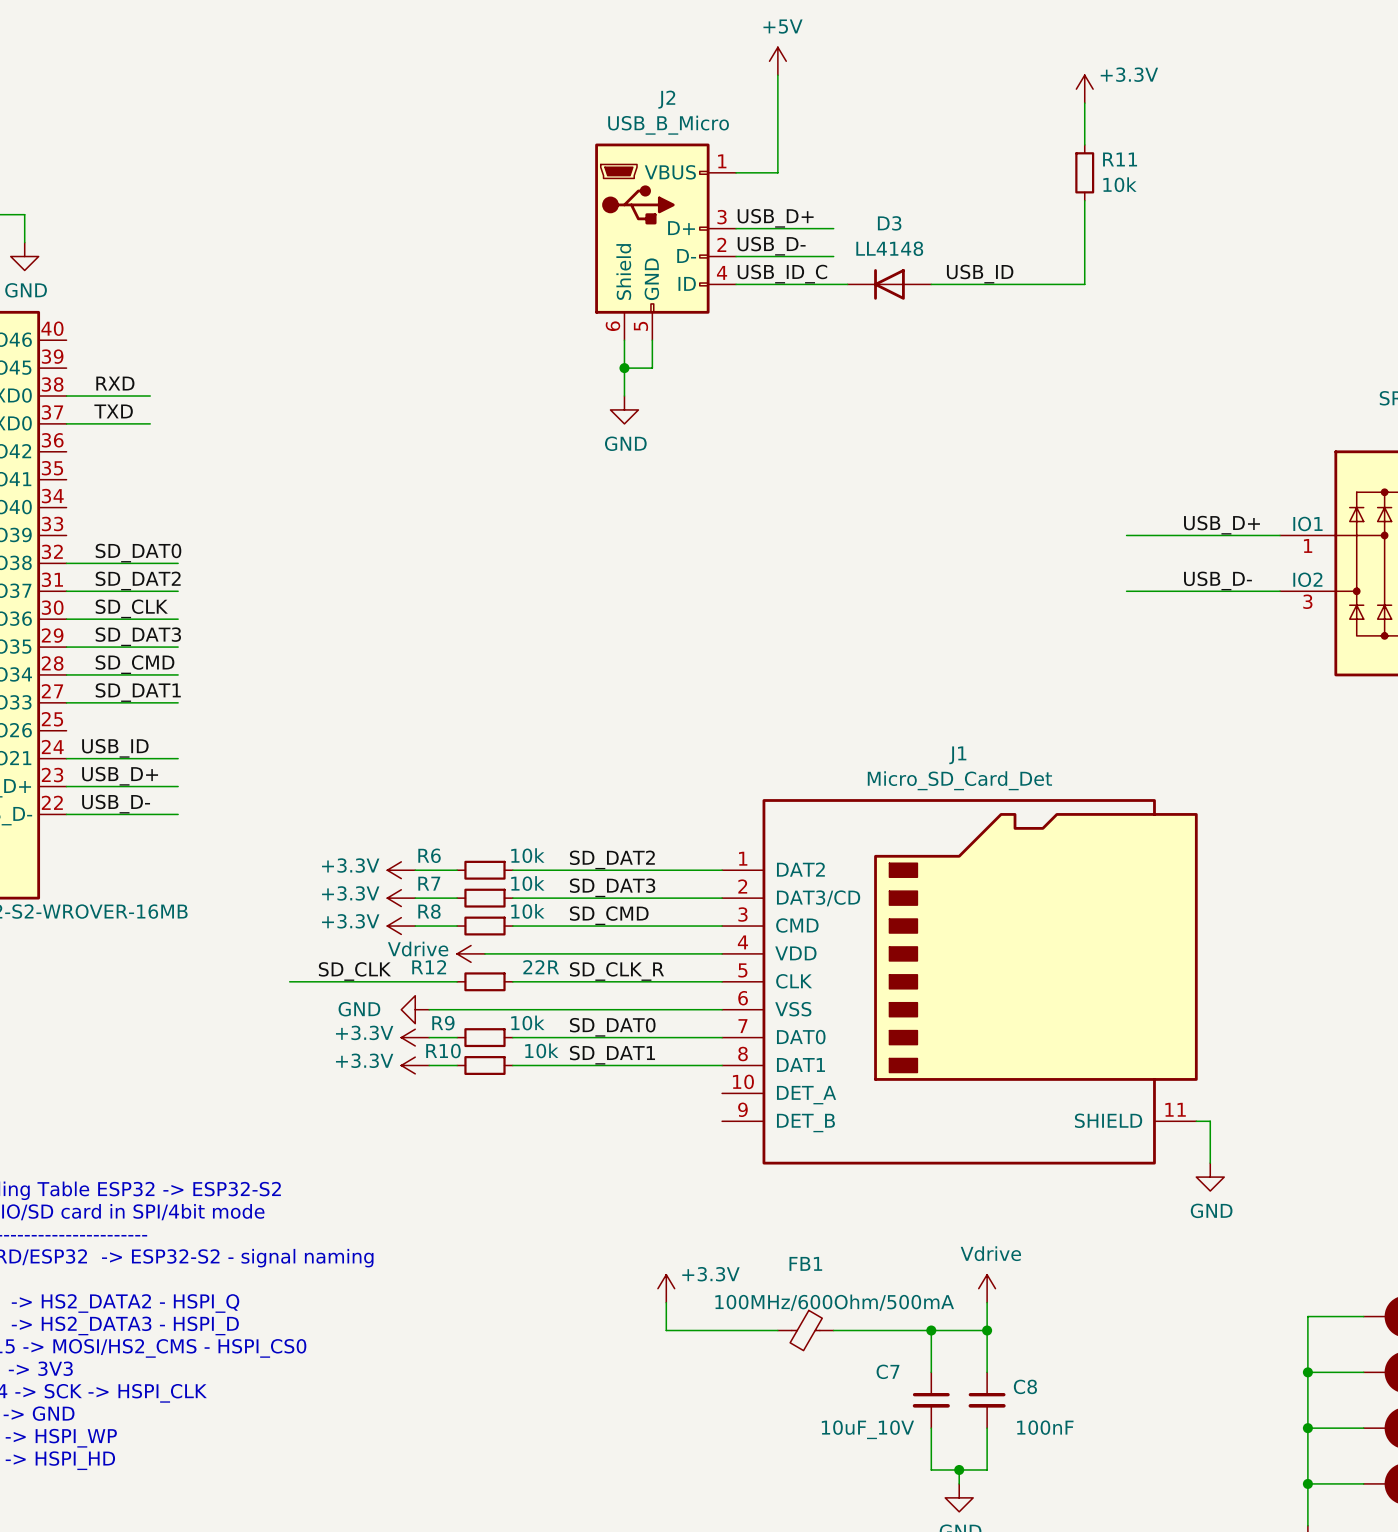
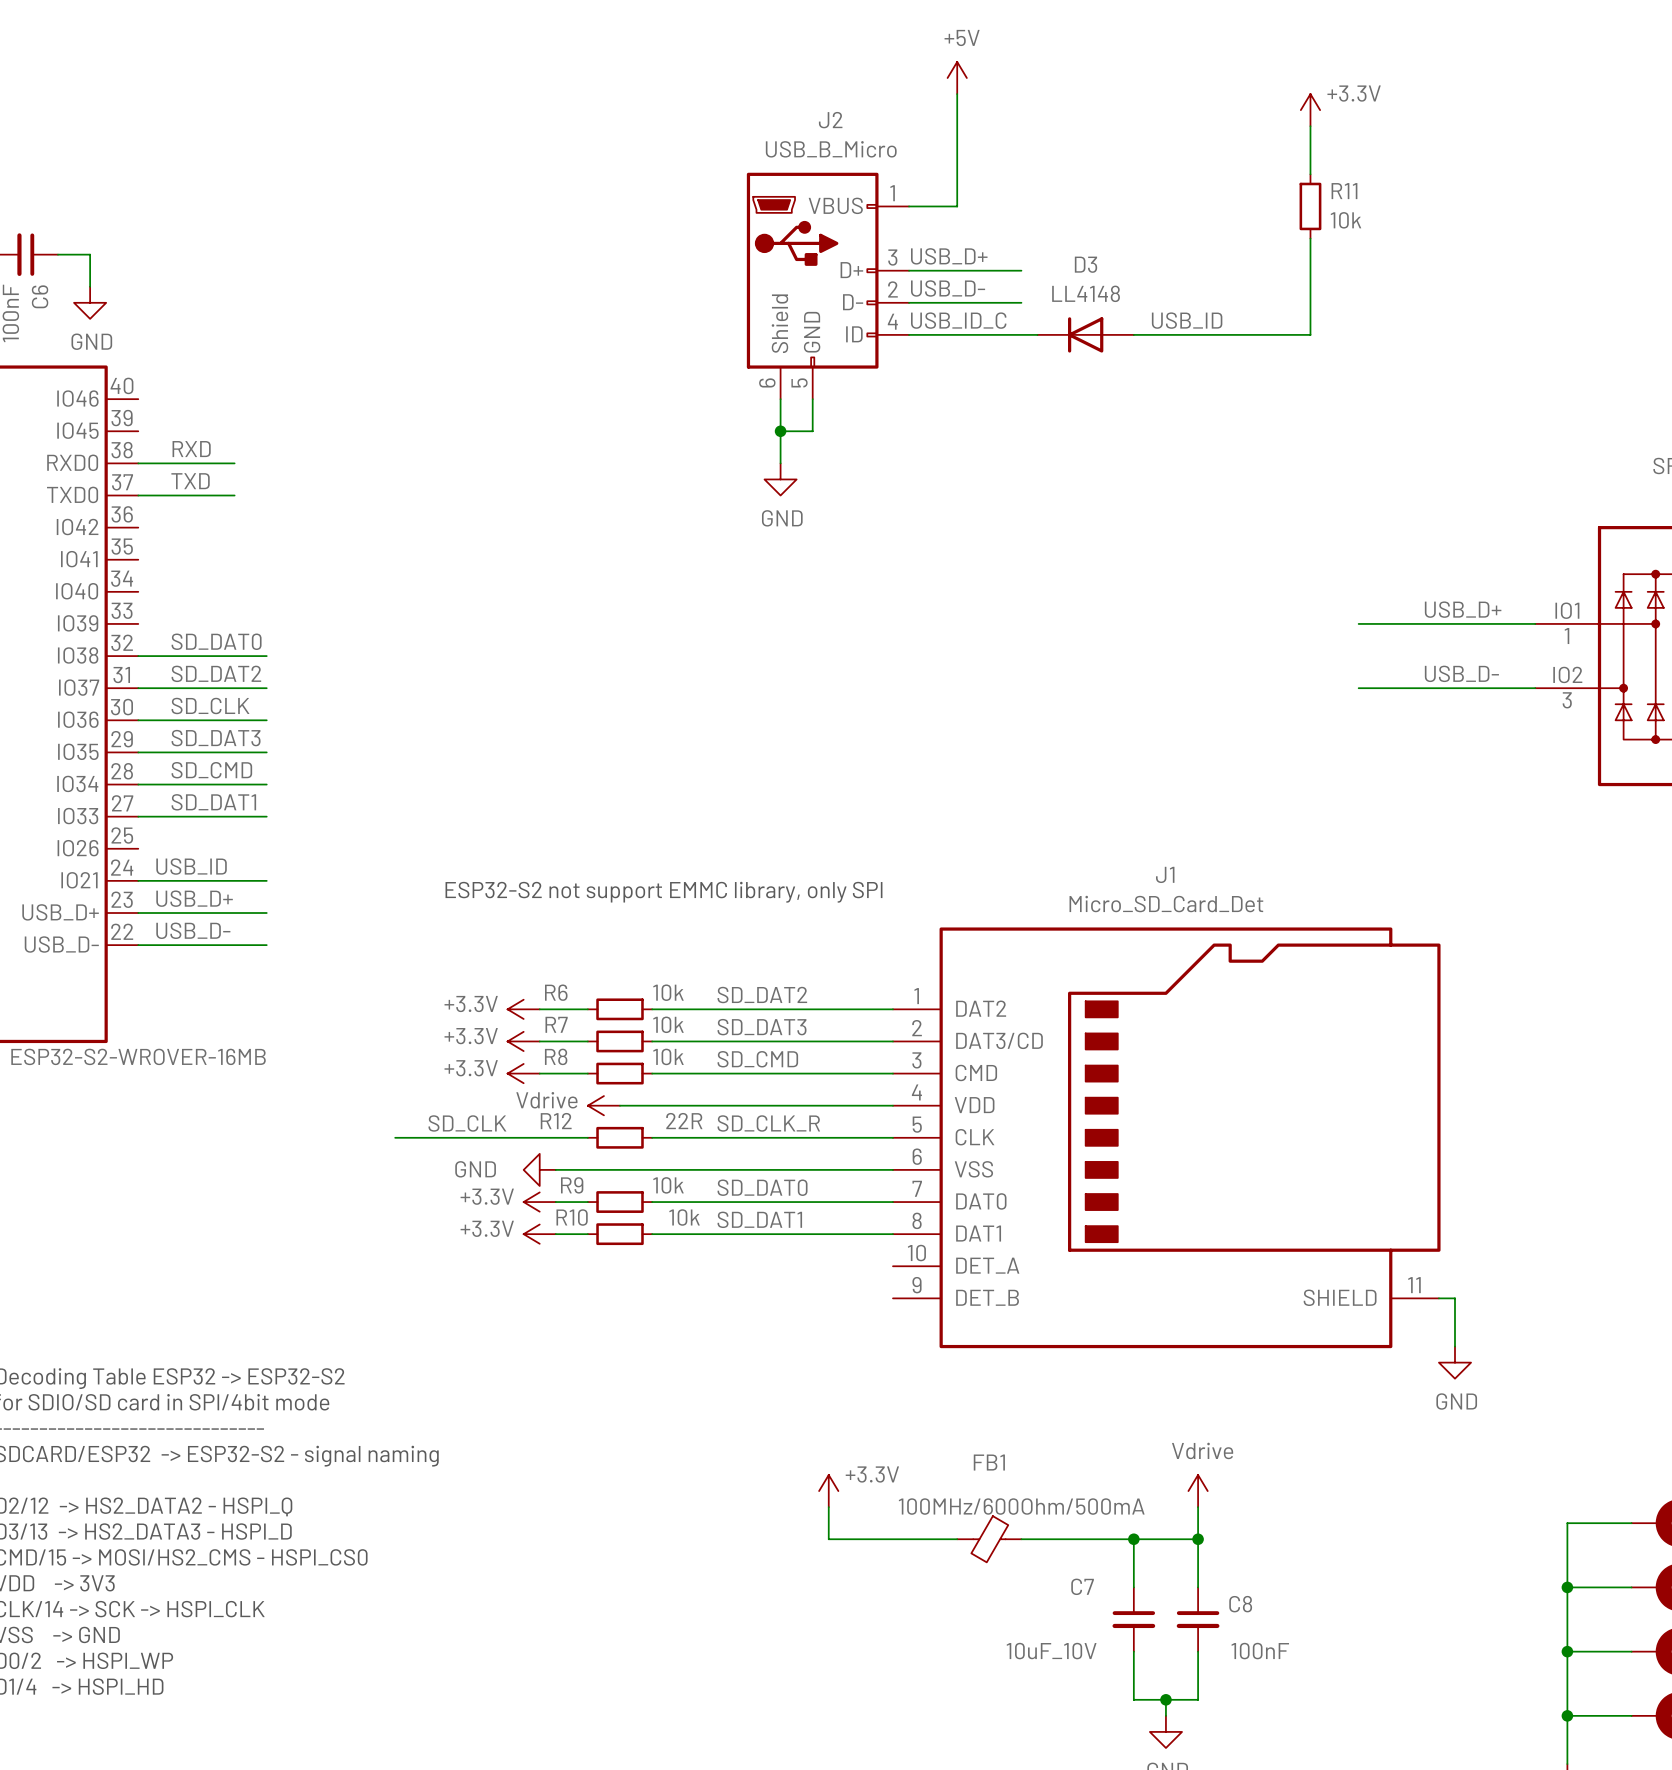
text: none -> ESP32-S2 not support EMMC library, only SPI (663, 892)

